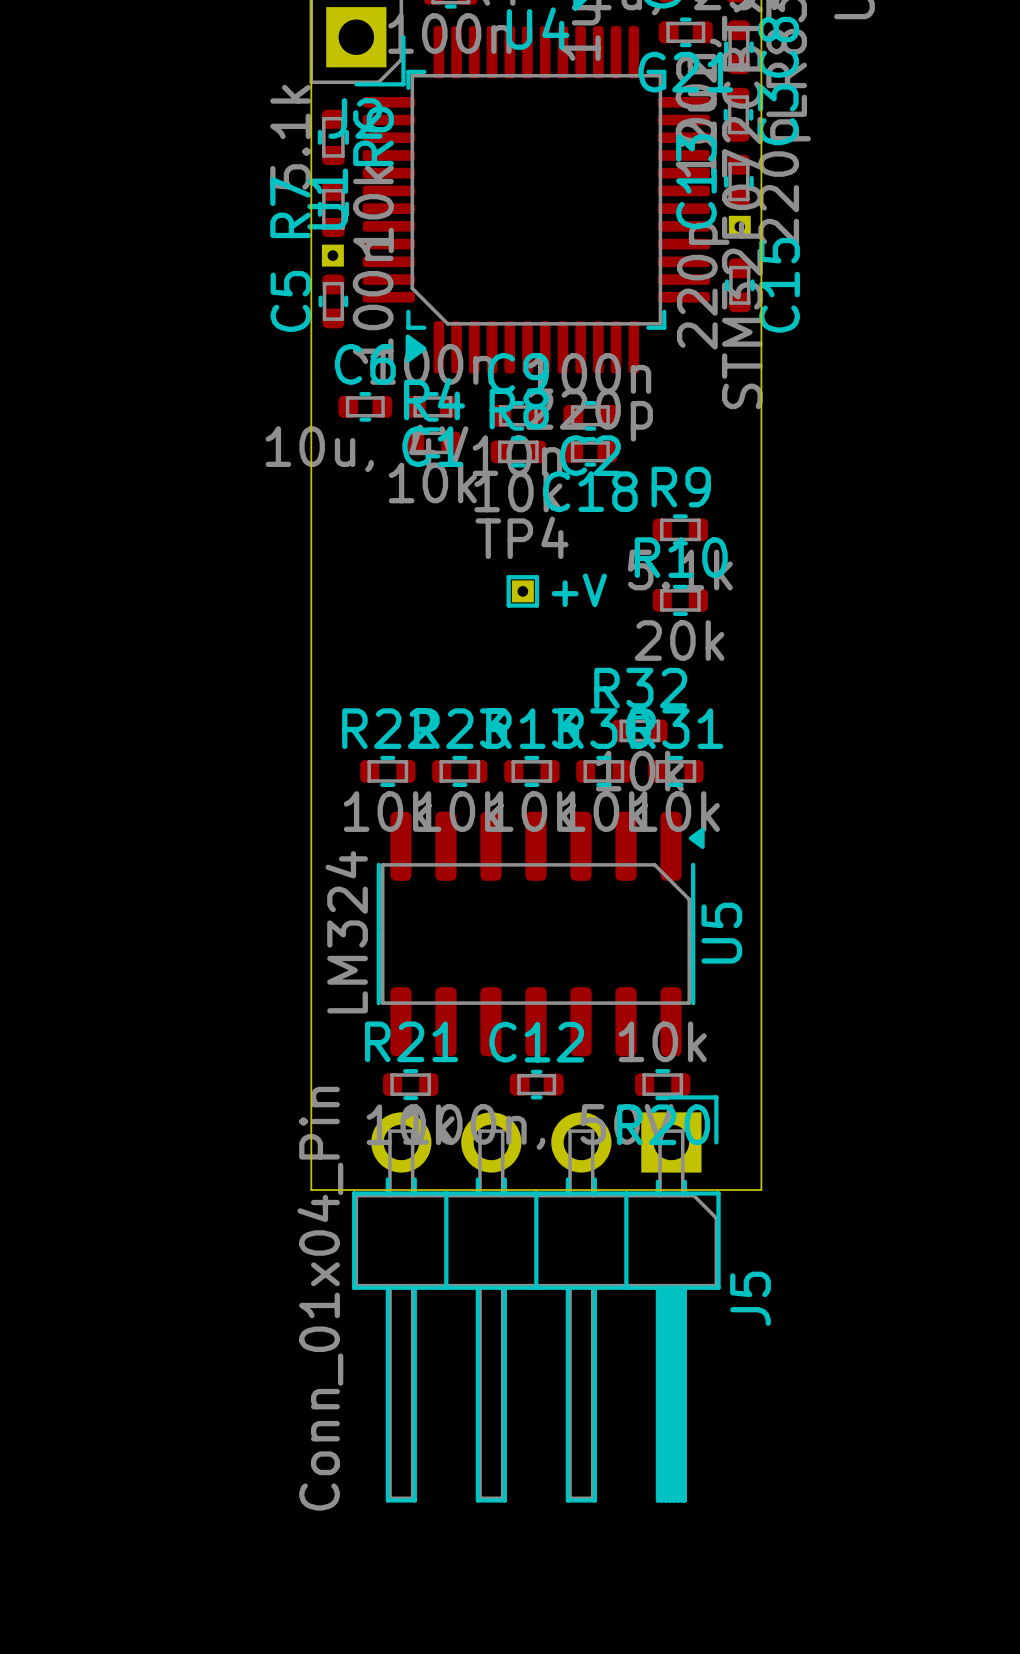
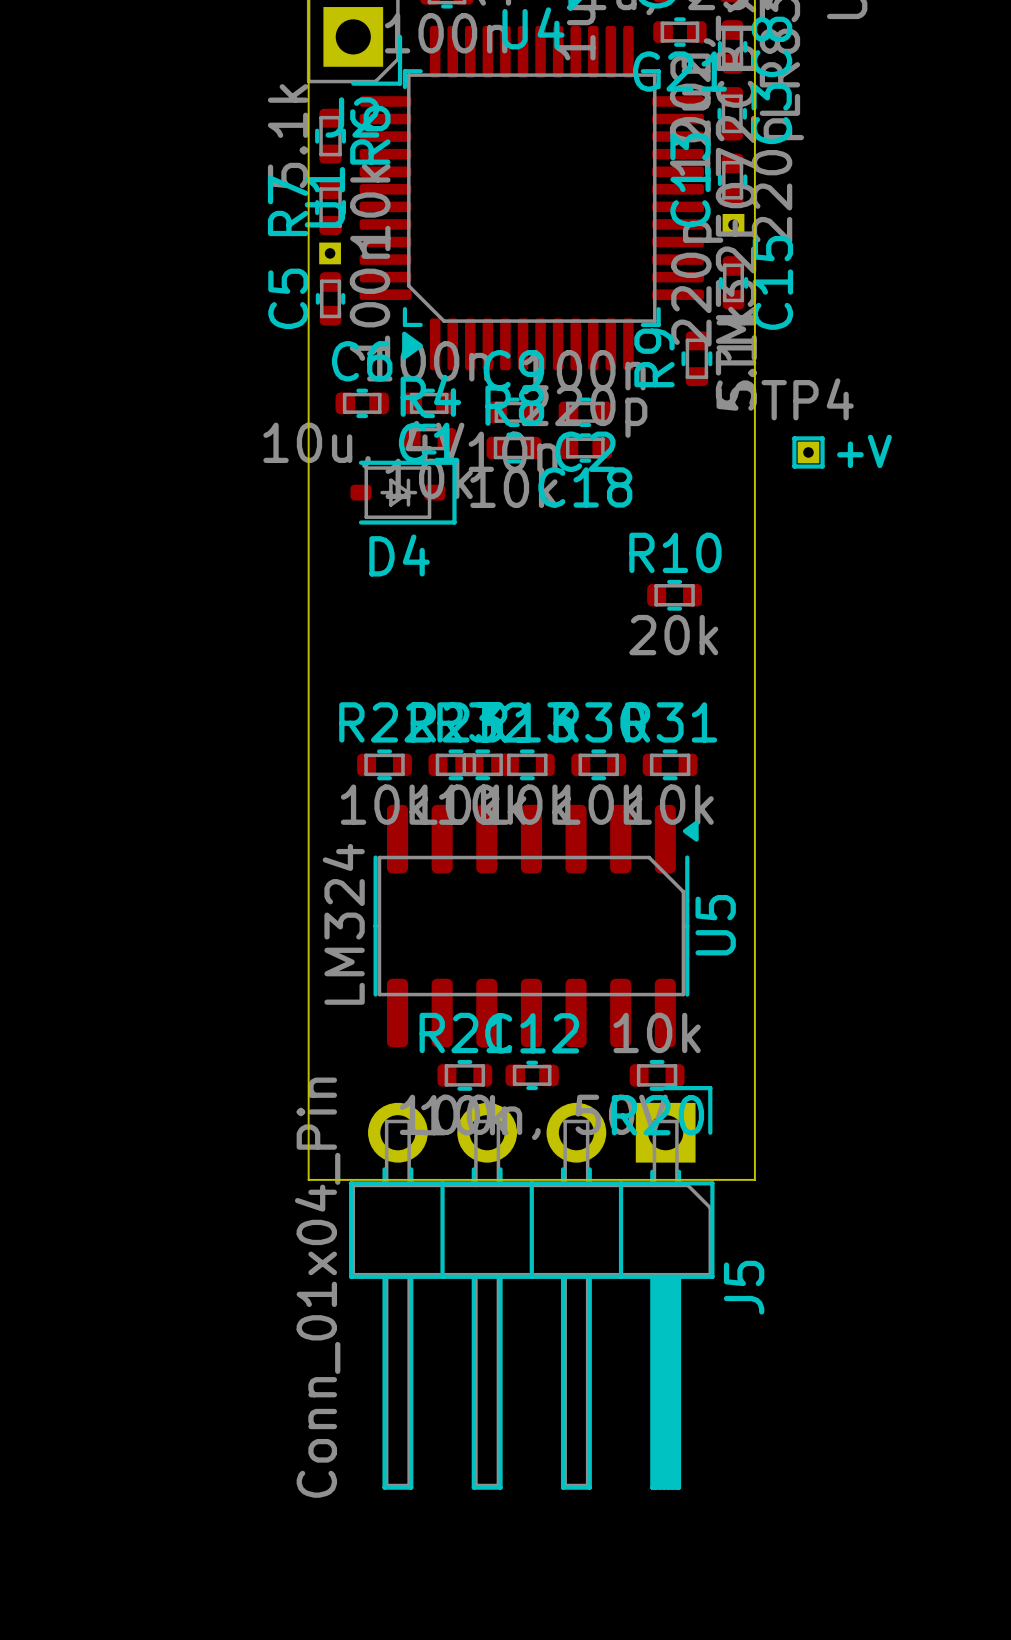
D4: none -> (403, 492)
R9 rotation: 0° (680, 529) -> 90° clockwise (696, 358)
R9 position: (680, 529) -> (696, 358)
TP4 position: (522, 591) -> (808, 452)
R32 position: (639, 730) -> (482, 764)
R21 position: (410, 1084) -> (464, 1075)

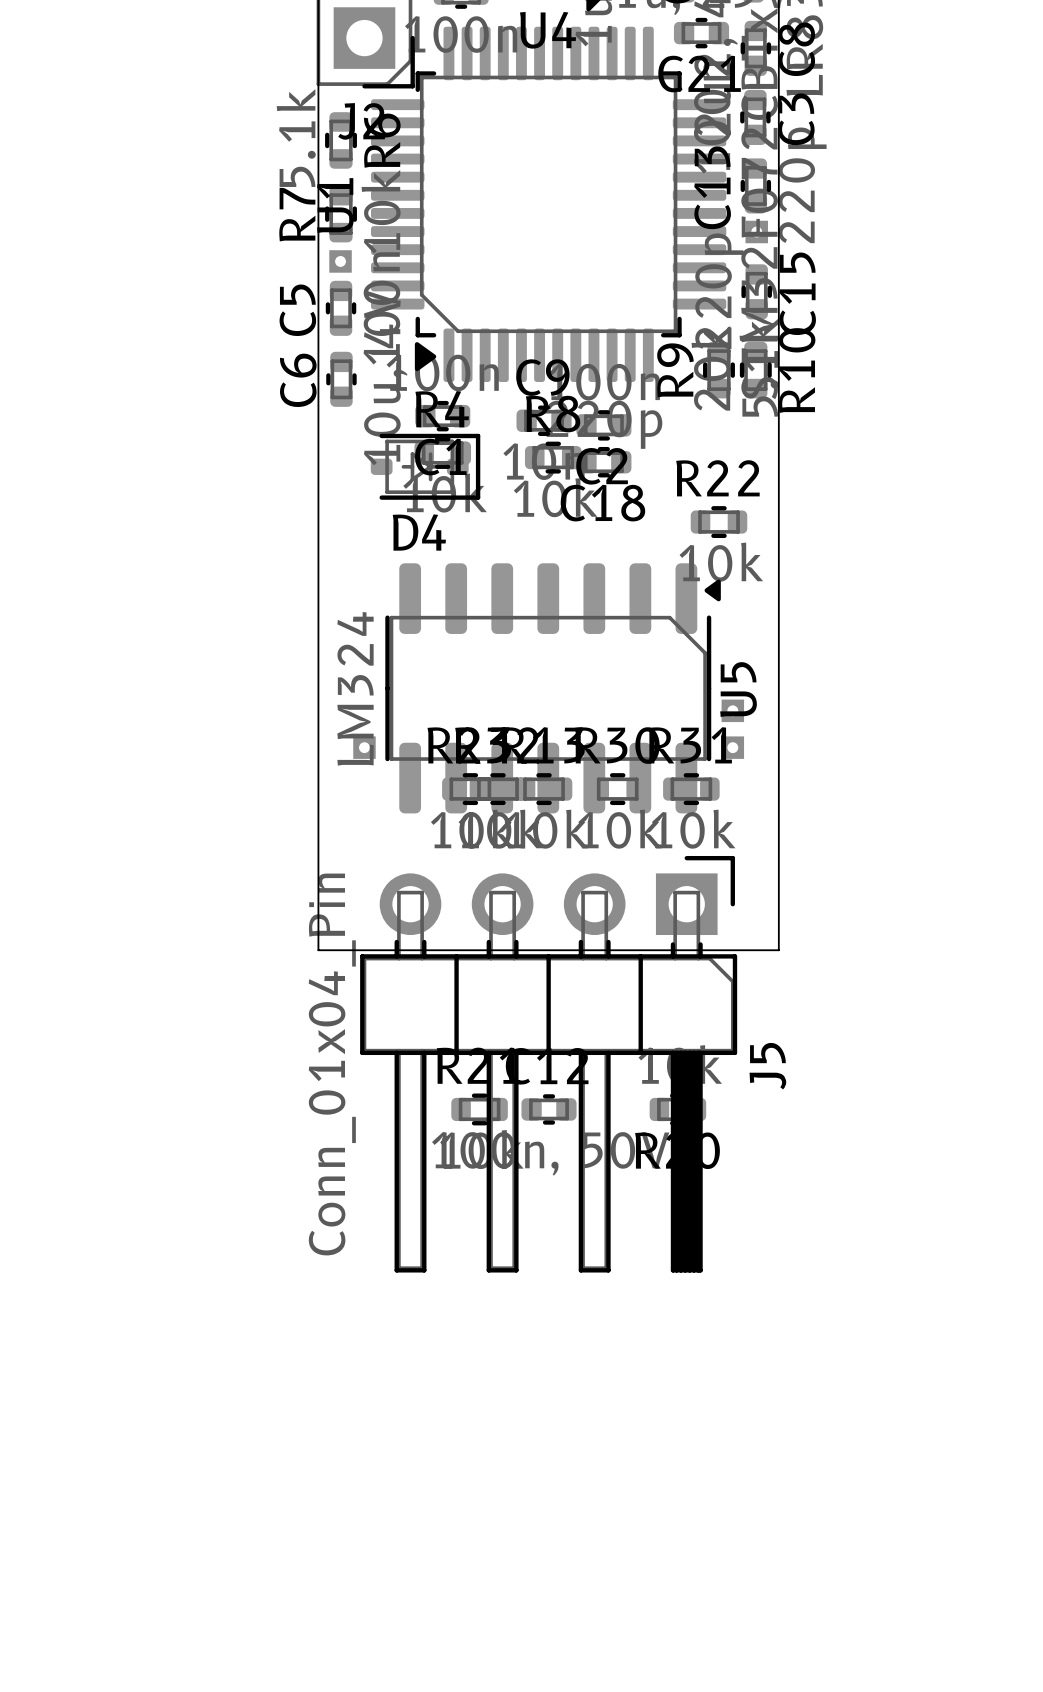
C6 rotation: 0° (362, 403) -> 90° clockwise (341, 379)
C6 position: (362, 403) -> (341, 379)
C9 position: (513, 412) -> (544, 420)
R8 position: (513, 448) -> (553, 457)
TP4 side: top (808, 452) -> bottom (732, 710)
D4 position: (403, 492) -> (425, 466)
R10 rotation: 0° (674, 595) -> 90° clockwise (755, 370)
R10 position: (674, 595) -> (755, 370)
part: none -> (364, 747)
part: none -> (732, 747)
R22 position: (384, 764) -> (718, 522)
board edge: (308, 921) (308, 1179) (754, 1179) (754, 921) -> (318, 950) (778, 950)
U5 position: (536, 926) -> (553, 688)
J5 position: (531, 1287) -> (548, 1064)

